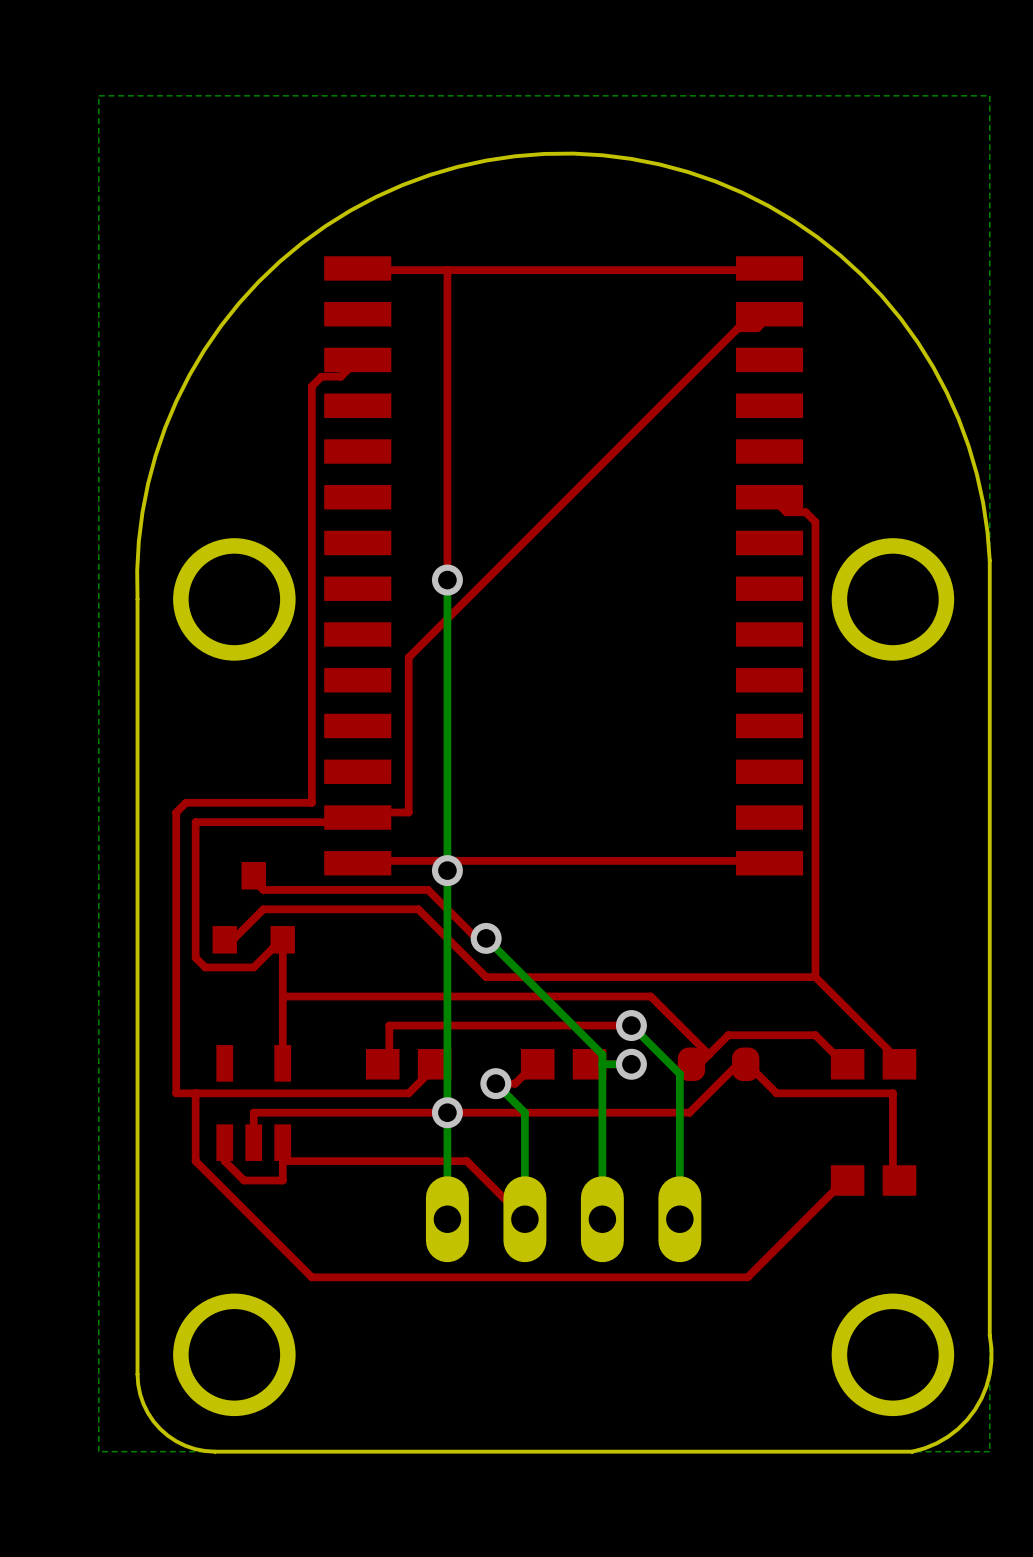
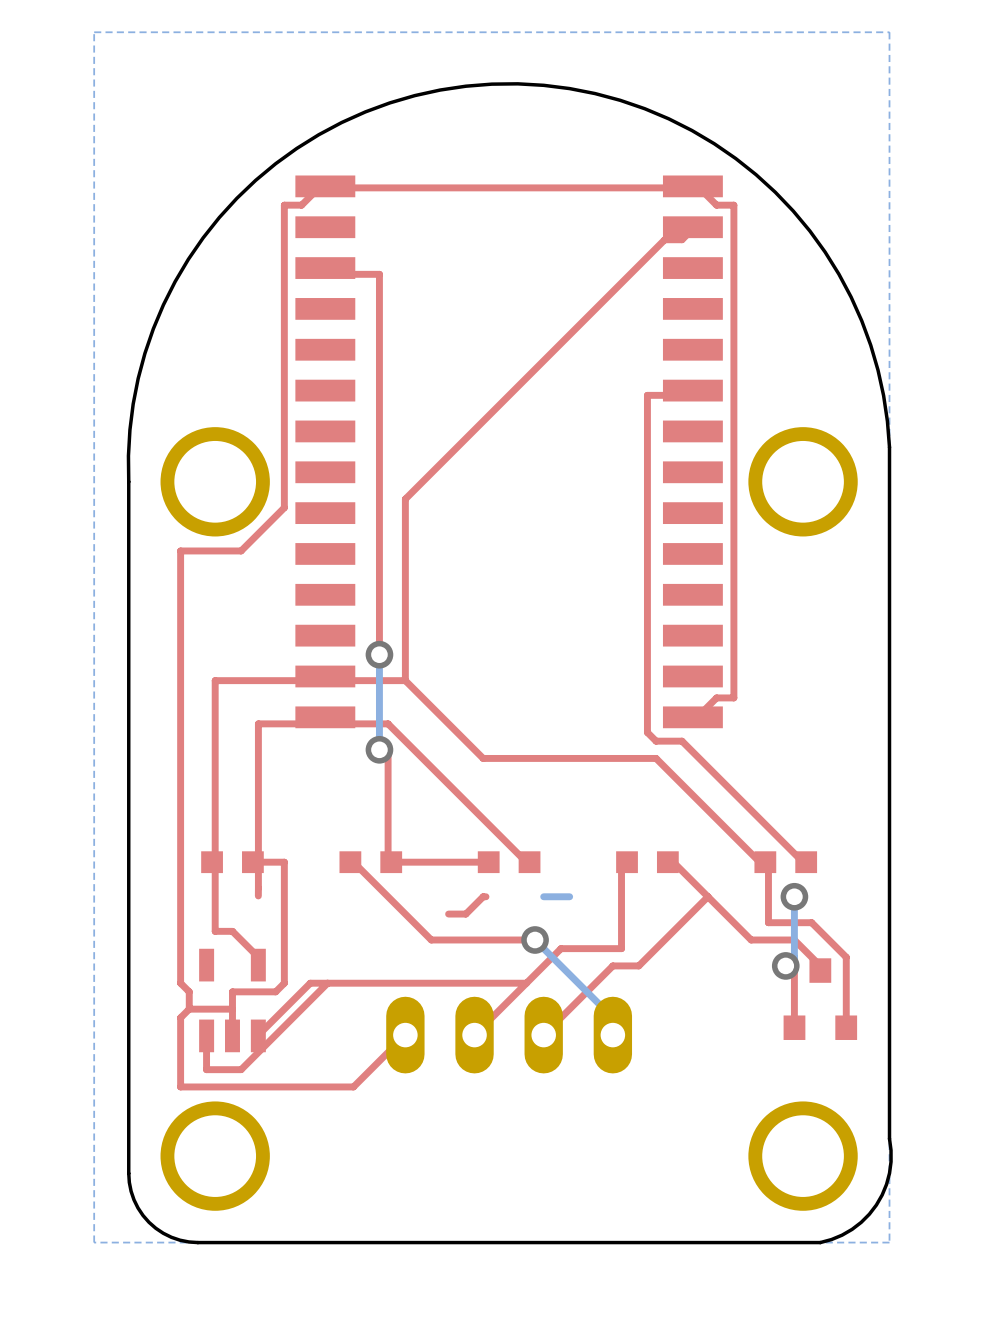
top track: (447, 270) (447, 580) -> none
top track: (357, 359) (340, 376) (321, 376) (311, 386) -> (325, 186) (318, 187) (301, 205) (284, 205) (284, 291)
top track: none -> (325, 268) (327, 274) (379, 274) (379, 654)
top track: (769, 497) (786, 512) (805, 512) (815, 521) -> (692, 186) (699, 187) (716, 205) (733, 205) (733, 412)
top track: none -> (692, 390) (690, 395) (647, 395) (647, 732) (656, 741) (682, 741) (803, 862)
bottom track: (447, 580) (447, 1219) -> none
via: (447, 580) -> none
top track: (447, 618) (408, 657) (408, 812) (360, 812) (357, 817) -> (405, 499) (405, 680)
top track: (311, 628) (311, 802) (185, 802) (176, 812) (176, 1093) (408, 1093) (437, 1064) (434, 1064) -> none
bottom track: none -> (379, 654) (379, 749)
via: none -> (379, 654)
top track: none -> (325, 676) (327, 680) (405, 680)
top track: (234, 822) (195, 822) -> (284, 507) (241, 550) (180, 550) (180, 680)
top track: none -> (215, 680) (215, 931) (232, 931) (258, 957) (258, 965)
top track: (815, 841) (815, 977) -> (733, 697) (716, 697) (699, 715) (692, 717)
top track: (769, 863) (767, 860) (360, 860) (357, 863) -> none
via: (447, 870) -> none
top track: (253, 875) (253, 880) (263, 889) (428, 889) (476, 938) (486, 938) -> none
via: none -> (379, 749)
part position: (253, 907) -> (820, 999)
bottom track: (486, 938) (602, 1054) (602, 1219) -> none
via: (486, 938) -> none
top track: (224, 939) (234, 938) (263, 909) (418, 909) (486, 977) (815, 977) -> none
top track: (282, 948) (282, 939) (253, 967) (205, 967) (195, 957) -> (180, 922) (180, 801)
top track: (815, 977) (902, 1064) (899, 1064) -> none
top track: (282, 996) (650, 996) (708, 1054) -> none
part: none -> (232, 862)
top track: none -> (252, 862) (284, 862) (284, 983) (275, 991) (232, 991) (232, 1035)
part: none -> (370, 862)
top track: (428, 1025) (389, 1025) (389, 1064) (382, 1064) -> (388, 862) (388, 749) (379, 749)
part: none -> (509, 862)
top track: (583, 1025) (540, 1025) -> (526, 862) (388, 723) (327, 723) (325, 717) (318, 723) (258, 723) (258, 793)
top track: (631, 1025) (586, 1025) -> none
bottom track: (631, 1025) (679, 1073) (679, 1199) -> (535, 939) (612, 1017)
via: (631, 1025) -> none
top track: none -> (627, 862) (621, 862) (621, 948) (560, 948) (474, 1035)
part: none -> (647, 862)
top track: none -> (667, 862) (673, 862) (751, 939) (794, 939) (820, 965) (820, 970)
part: none -> (785, 862)
part: (408, 1064) -> none
part: (563, 1064) -> none
via: (631, 1064) -> none
part: (718, 1064) -> none
top track: none -> (707, 896) (638, 965) (612, 965) (543, 1035)
top track: (847, 1064) (844, 1064) (815, 1035) (728, 1035) (699, 1064) (691, 1064) -> none
part: (873, 1064) -> none
bottom track: none -> (794, 896) (794, 957) (785, 965)
via: none -> (794, 896)
bottom track: (495, 1083) (524, 1112) (524, 1219) -> none
via: (495, 1083) -> none
top track: (854, 1093) (776, 1093) (747, 1064) (737, 1064) (689, 1112) (592, 1112) -> (768, 922) (768, 862) (759, 862) (656, 758) (483, 758) (405, 680)
top track: (892, 1093) (892, 1180) (899, 1180) -> (803, 922) (811, 922) (846, 957) (846, 1027)
part position: (253, 1103) -> (232, 1000)
via: (447, 1112) -> none
top track: (476, 1112) (253, 1112) (253, 1142) -> (431, 939) (353, 862) (350, 862)
via: none -> (535, 939)
top track: none -> (785, 965) (794, 965) (794, 1027)
via: none -> (785, 965)
top track: (282, 1142) (282, 1180) (244, 1180) (224, 1161) (224, 1142) -> none
top track: (340, 1161) (282, 1161) -> (310, 983) (258, 1035)
top track: none -> (327, 983) (241, 1069) (206, 1069) (206, 1035)
top track: (466, 1161) (524, 1219) -> (422, 983) (526, 983)
top track: (205, 1170) (311, 1277) -> (189, 1009) (180, 1017) (180, 1086) (284, 1086)
top track: none -> (189, 991) (189, 1009)
top track: (847, 1180) (844, 1180) (747, 1277) (389, 1277) -> (405, 1035) (353, 1086)
part: (873, 1180) -> none
top track: none -> (232, 1009) (189, 1009)

